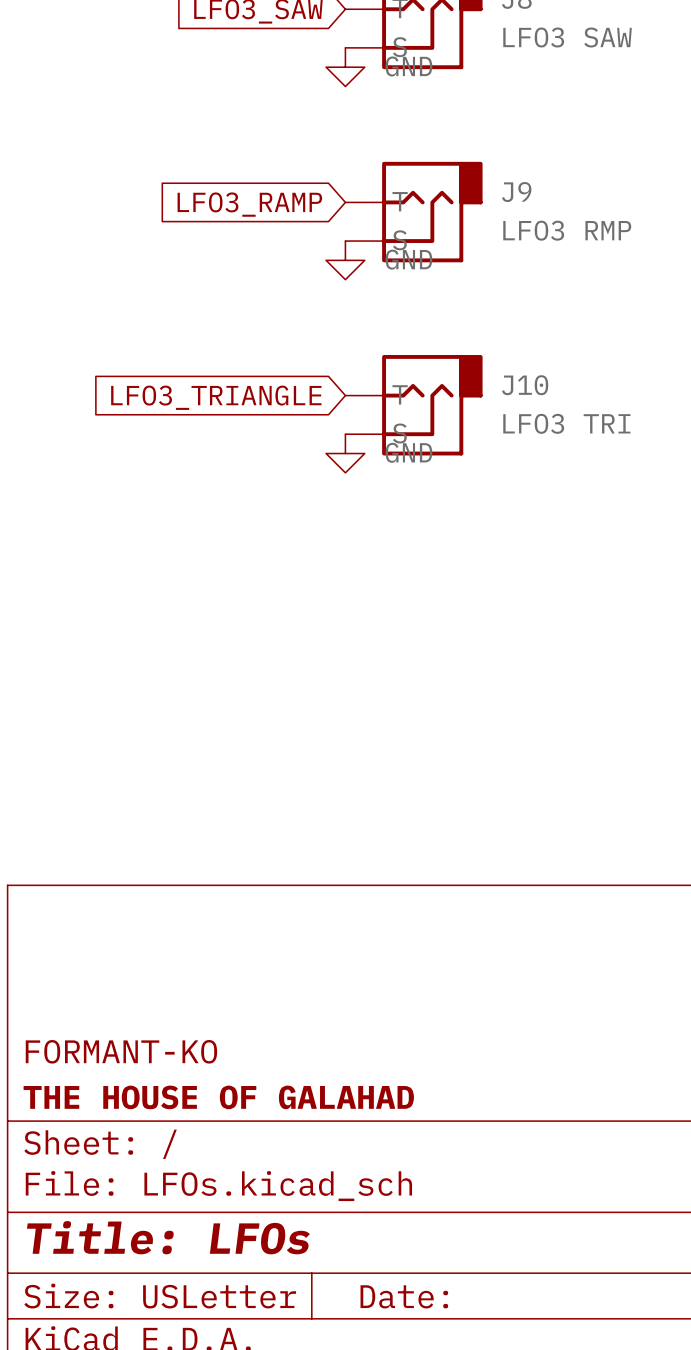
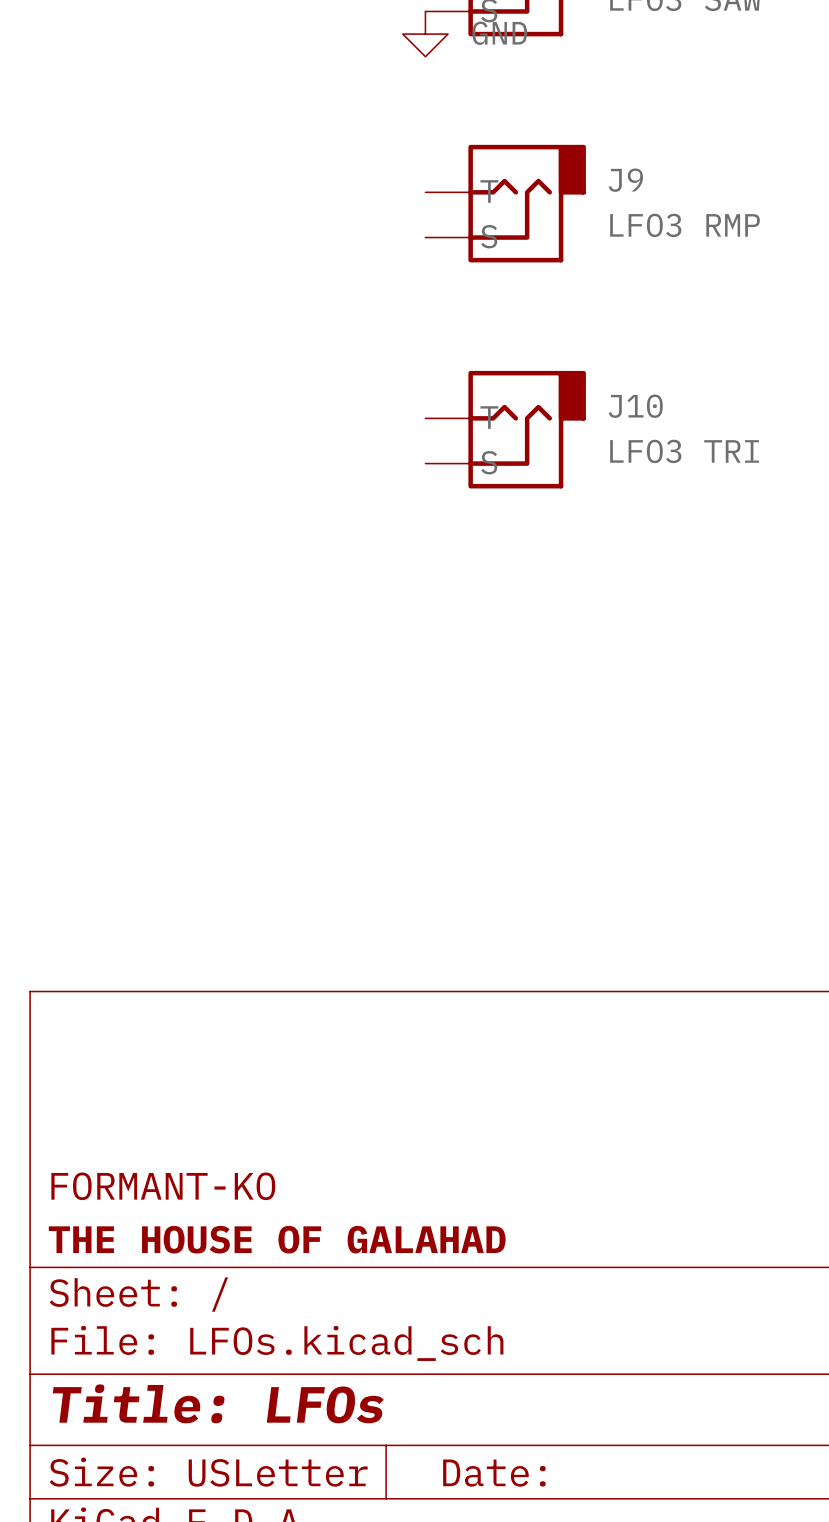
global label: LFO3_RAMP (249, 204) -> none
power symbol: GND (345, 260) -> none
global label: LFO3_TRIANGLE (216, 397) -> none
power symbol: GND (345, 453) -> none

